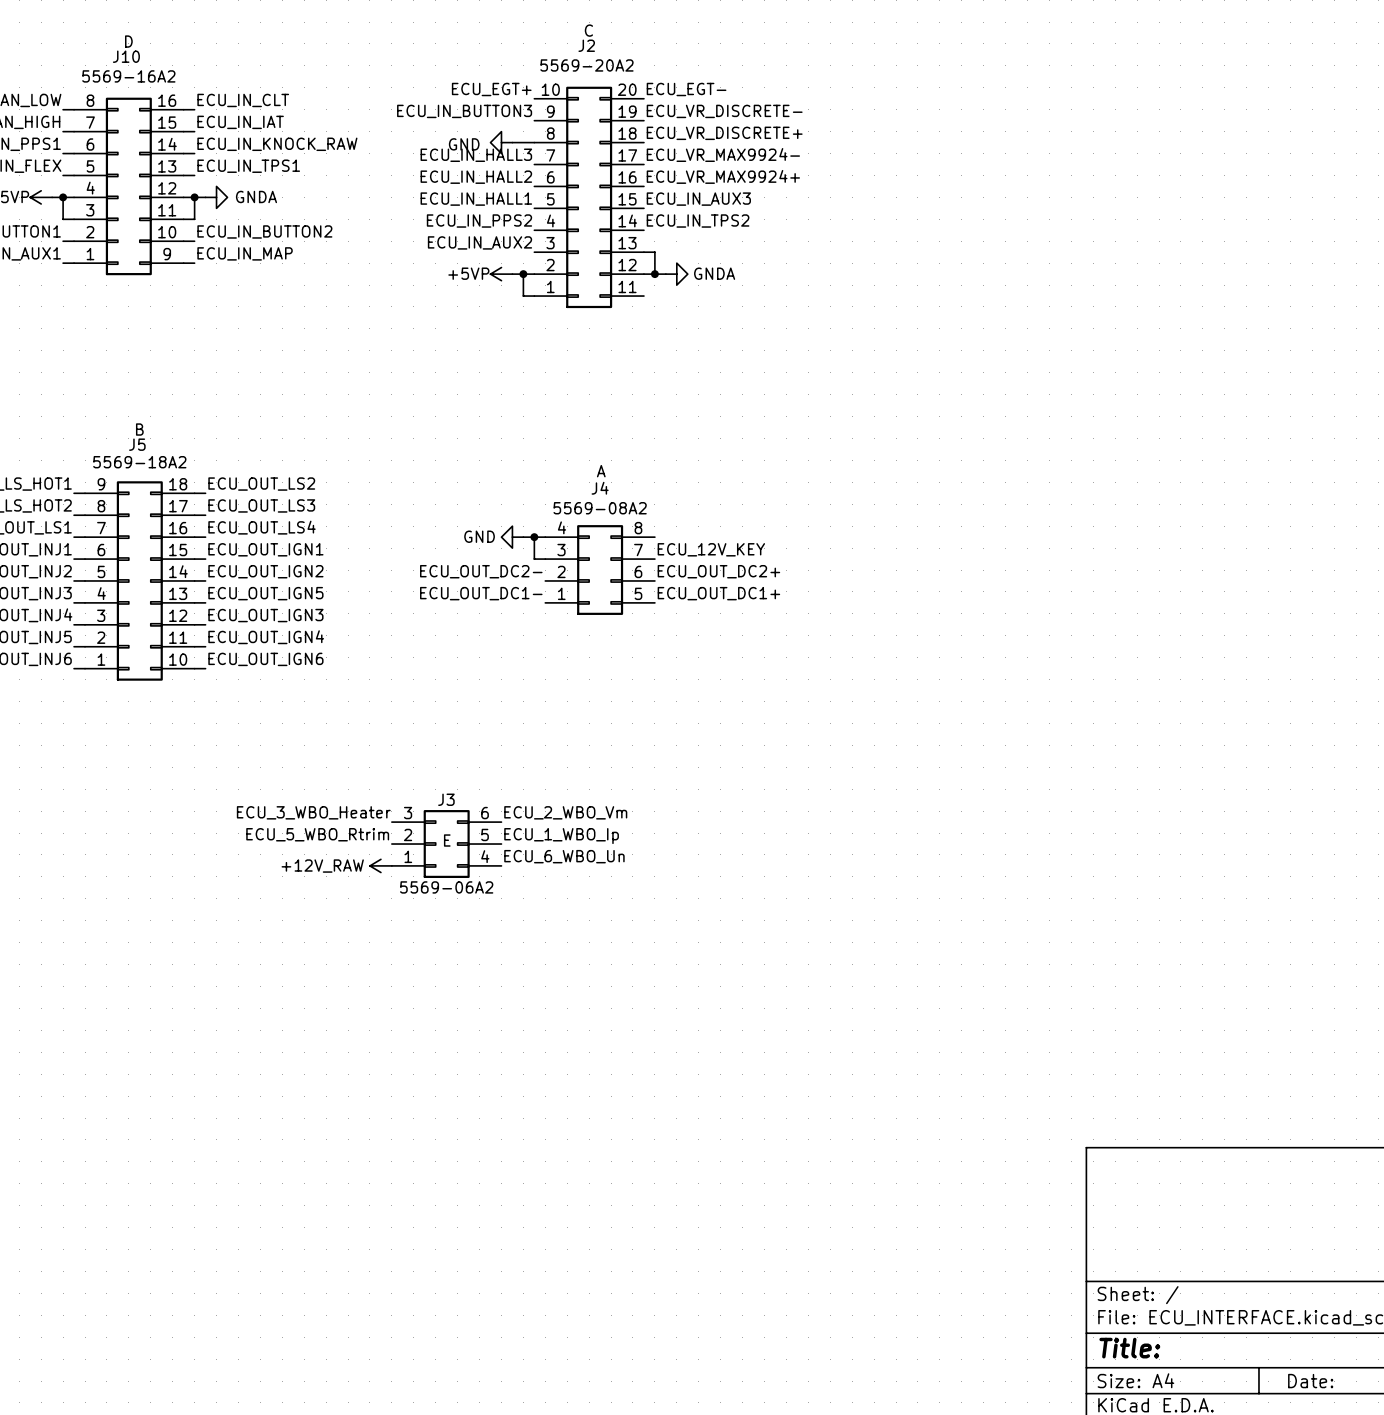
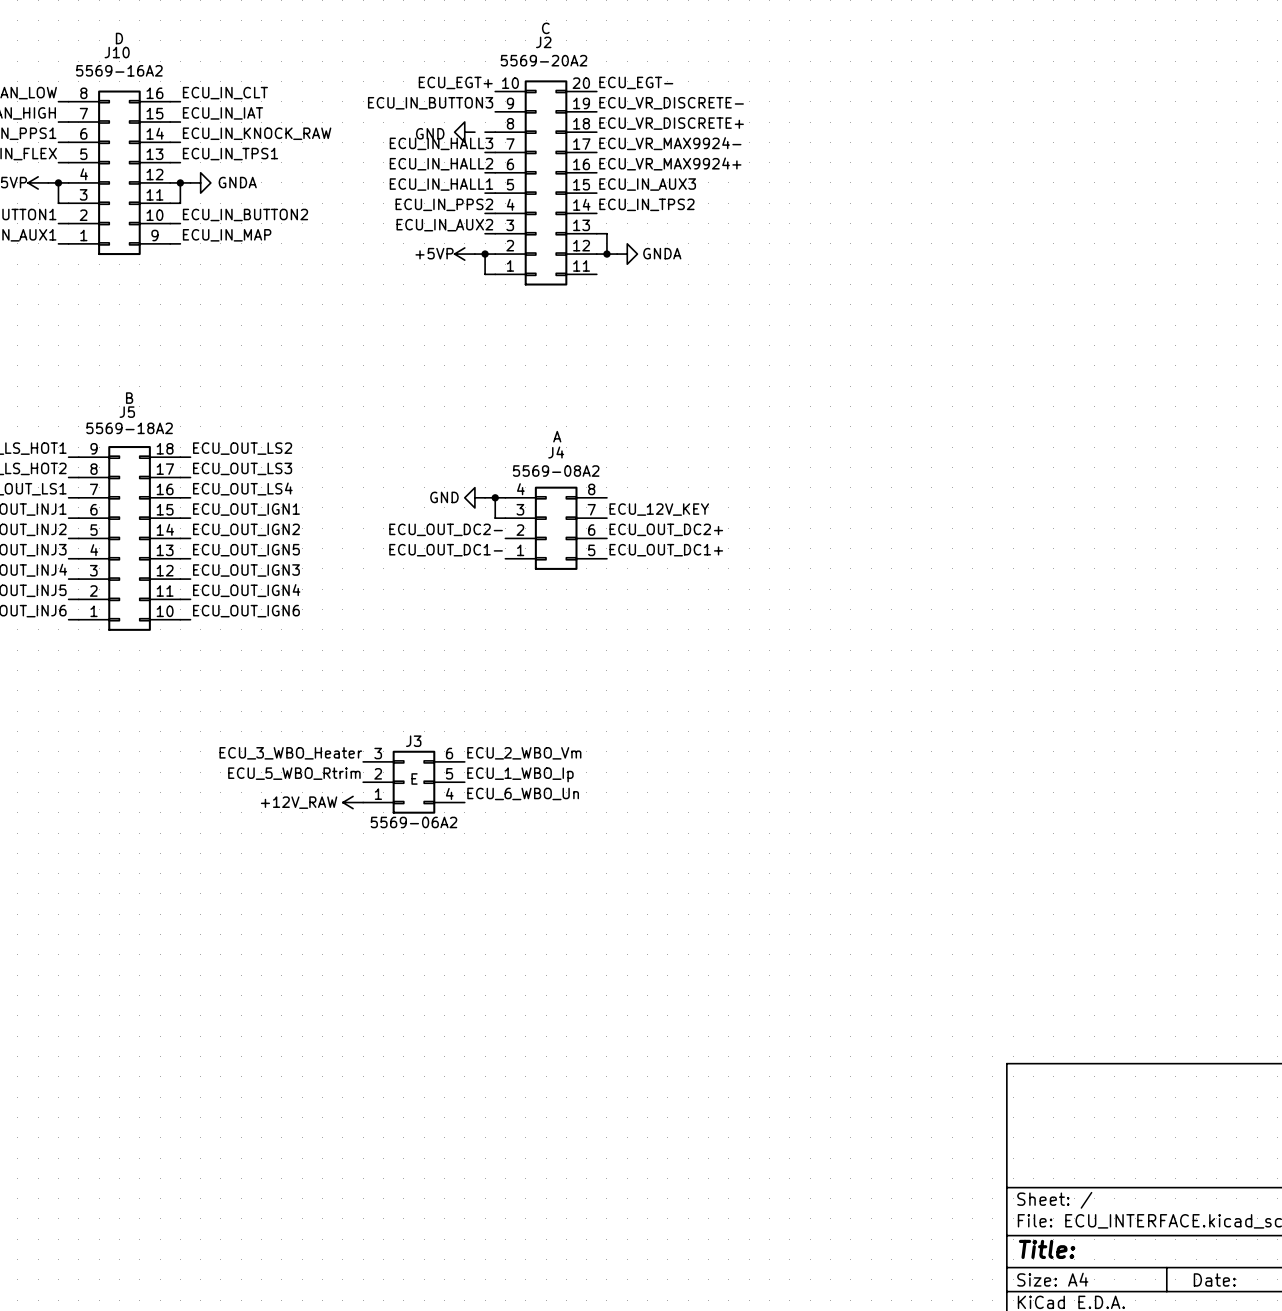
wire: (512, 142) (523, 142) -> (485, 152) (495, 152)
wire: none -> (485, 172) (495, 172)
wire: none -> (485, 193) (495, 193)
wire: none -> (485, 213) (495, 213)
wire: none -> (485, 233) (495, 233)

